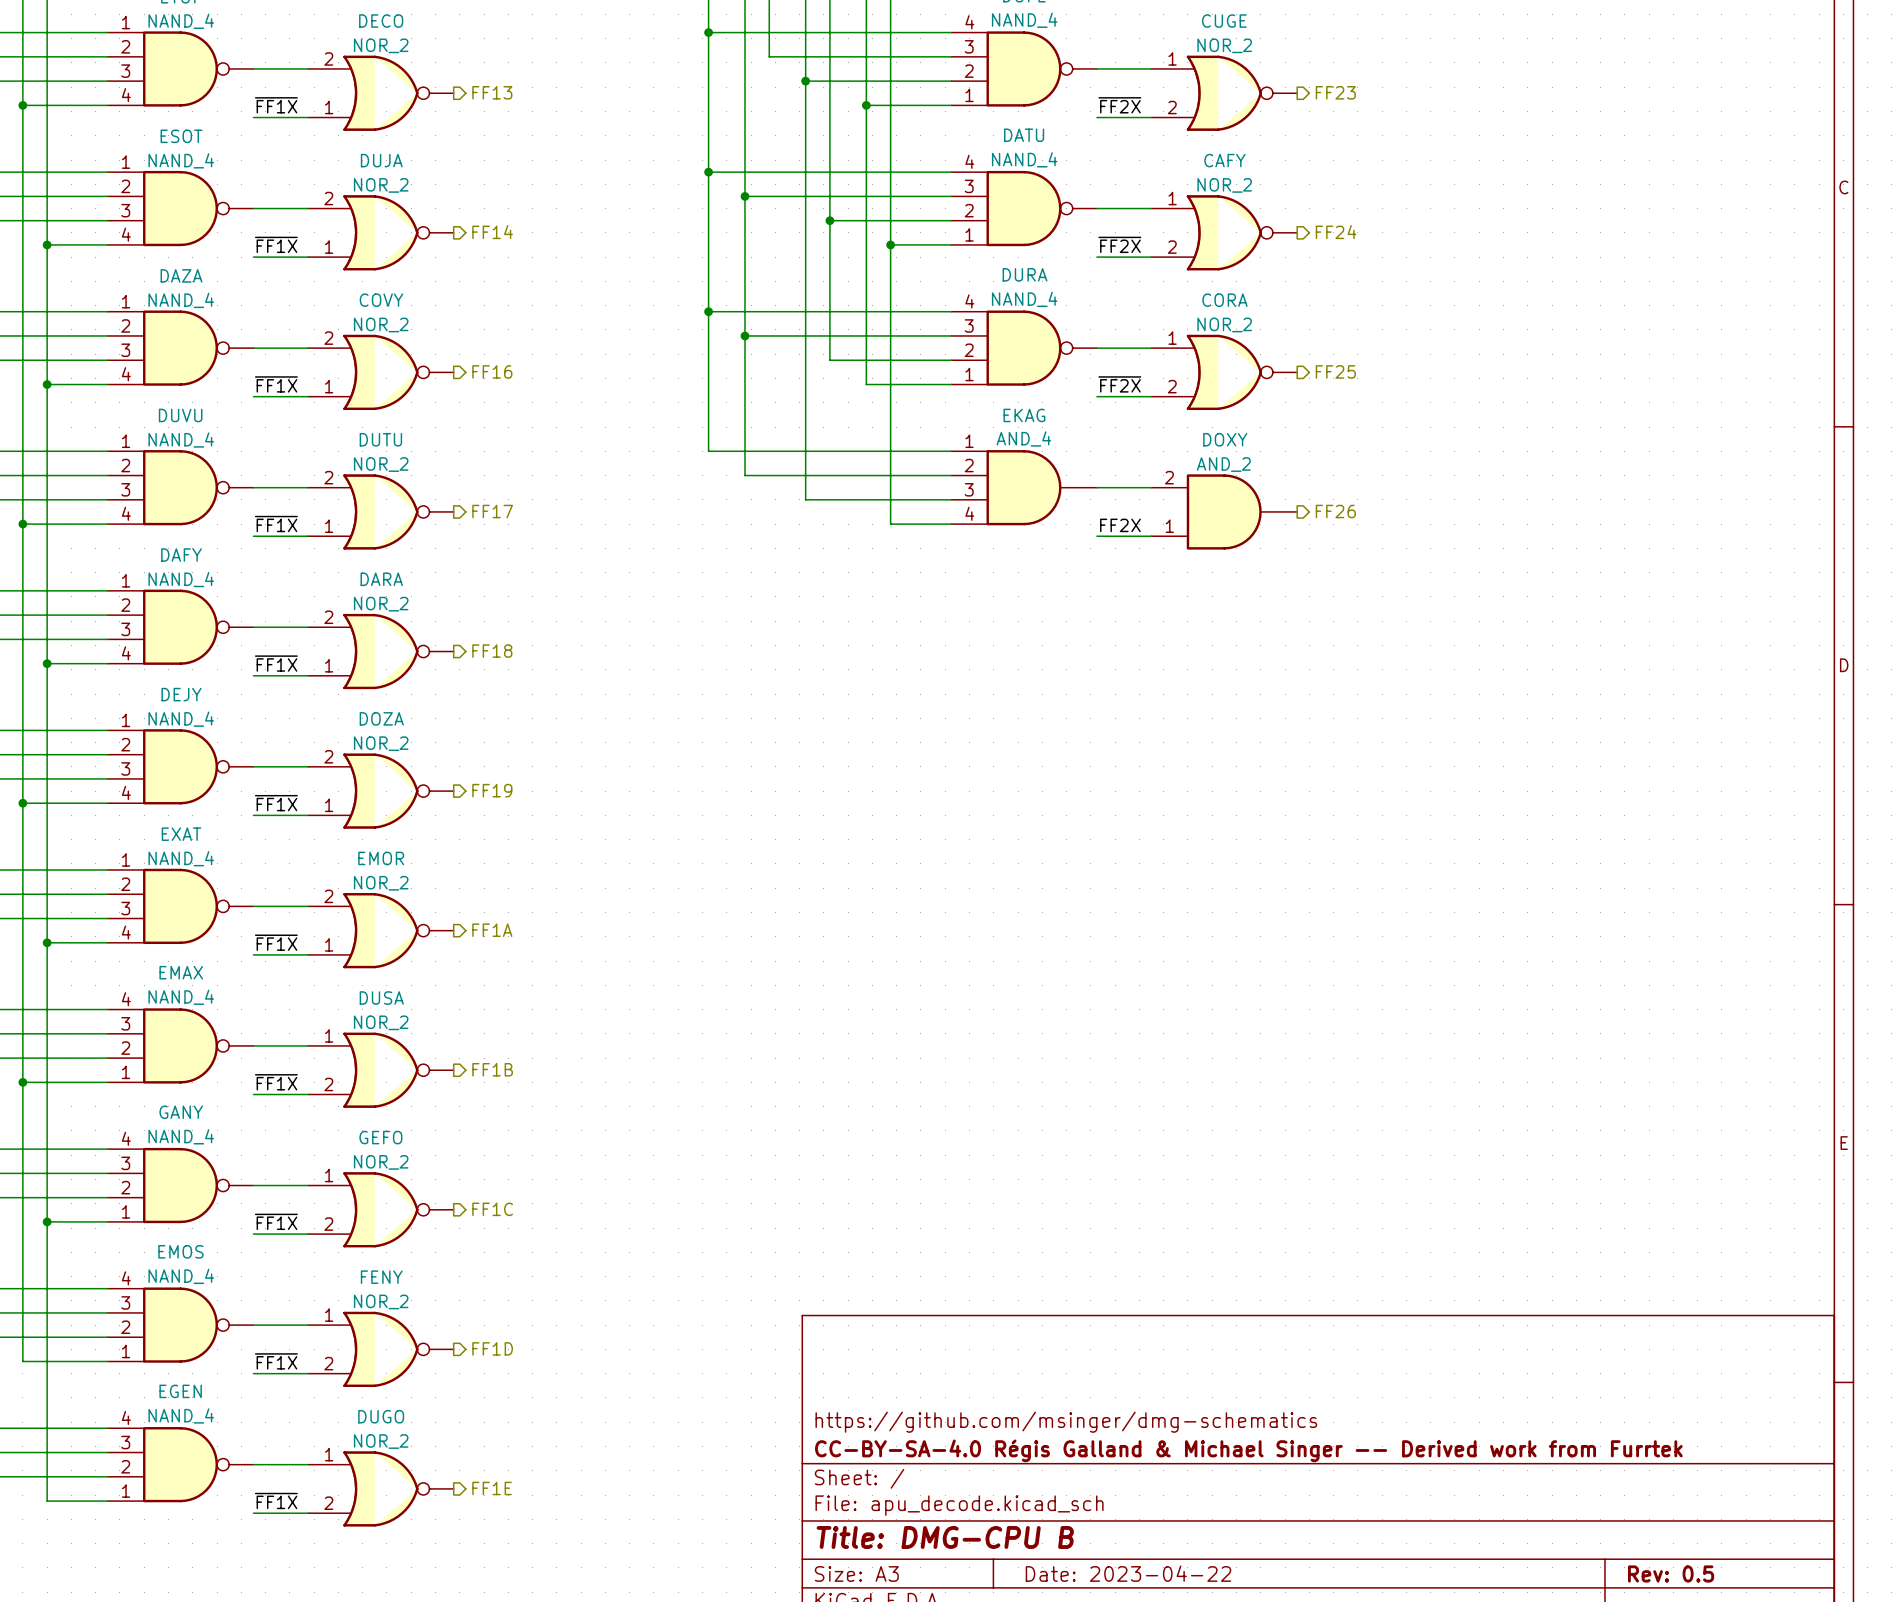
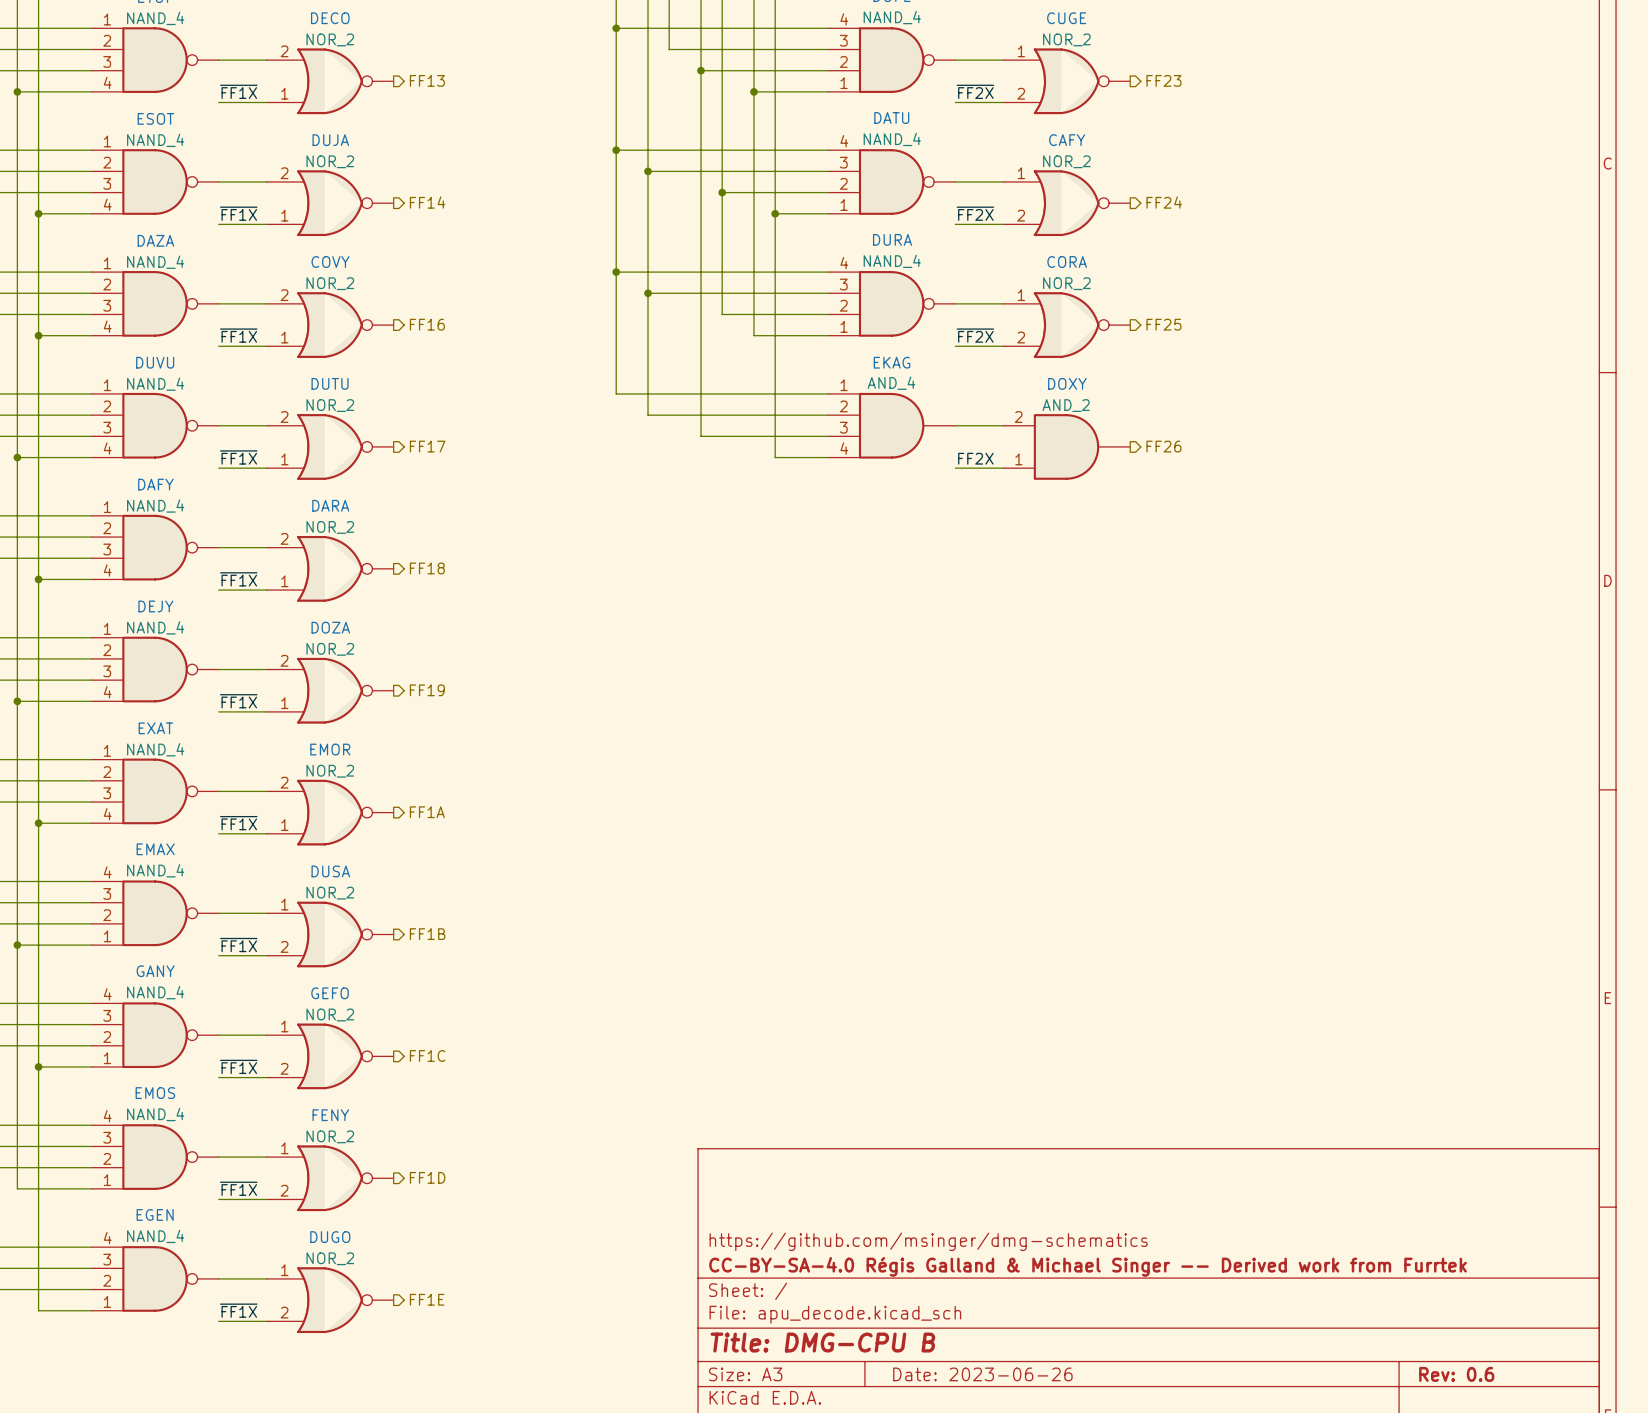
title block: Date: 2023-04-22 (1128, 1573) -> Date: 2023-06-26 (982, 1374)
title block: Rev: 0.5 (1671, 1573) -> Rev: 0.6 (1456, 1374)

